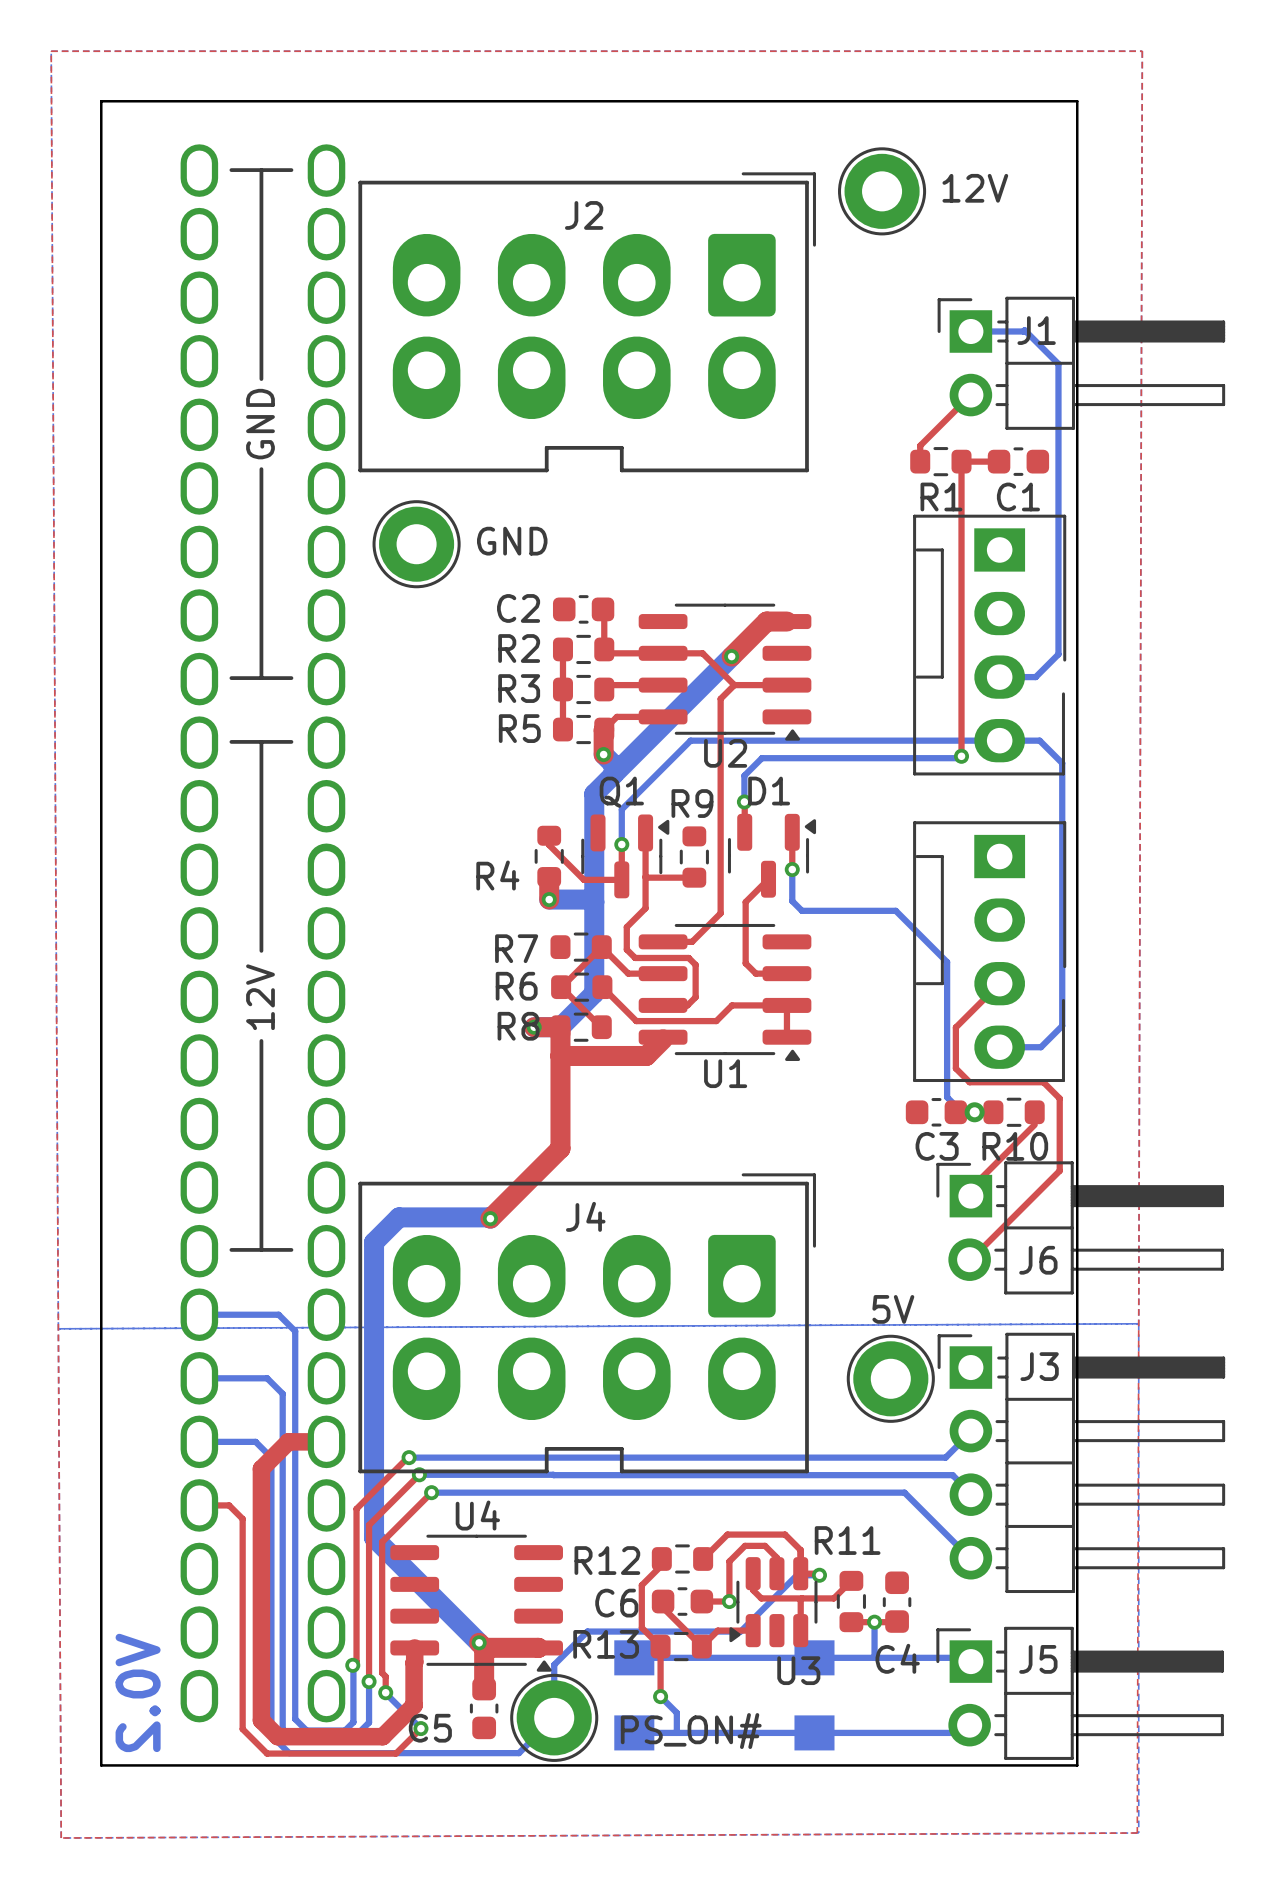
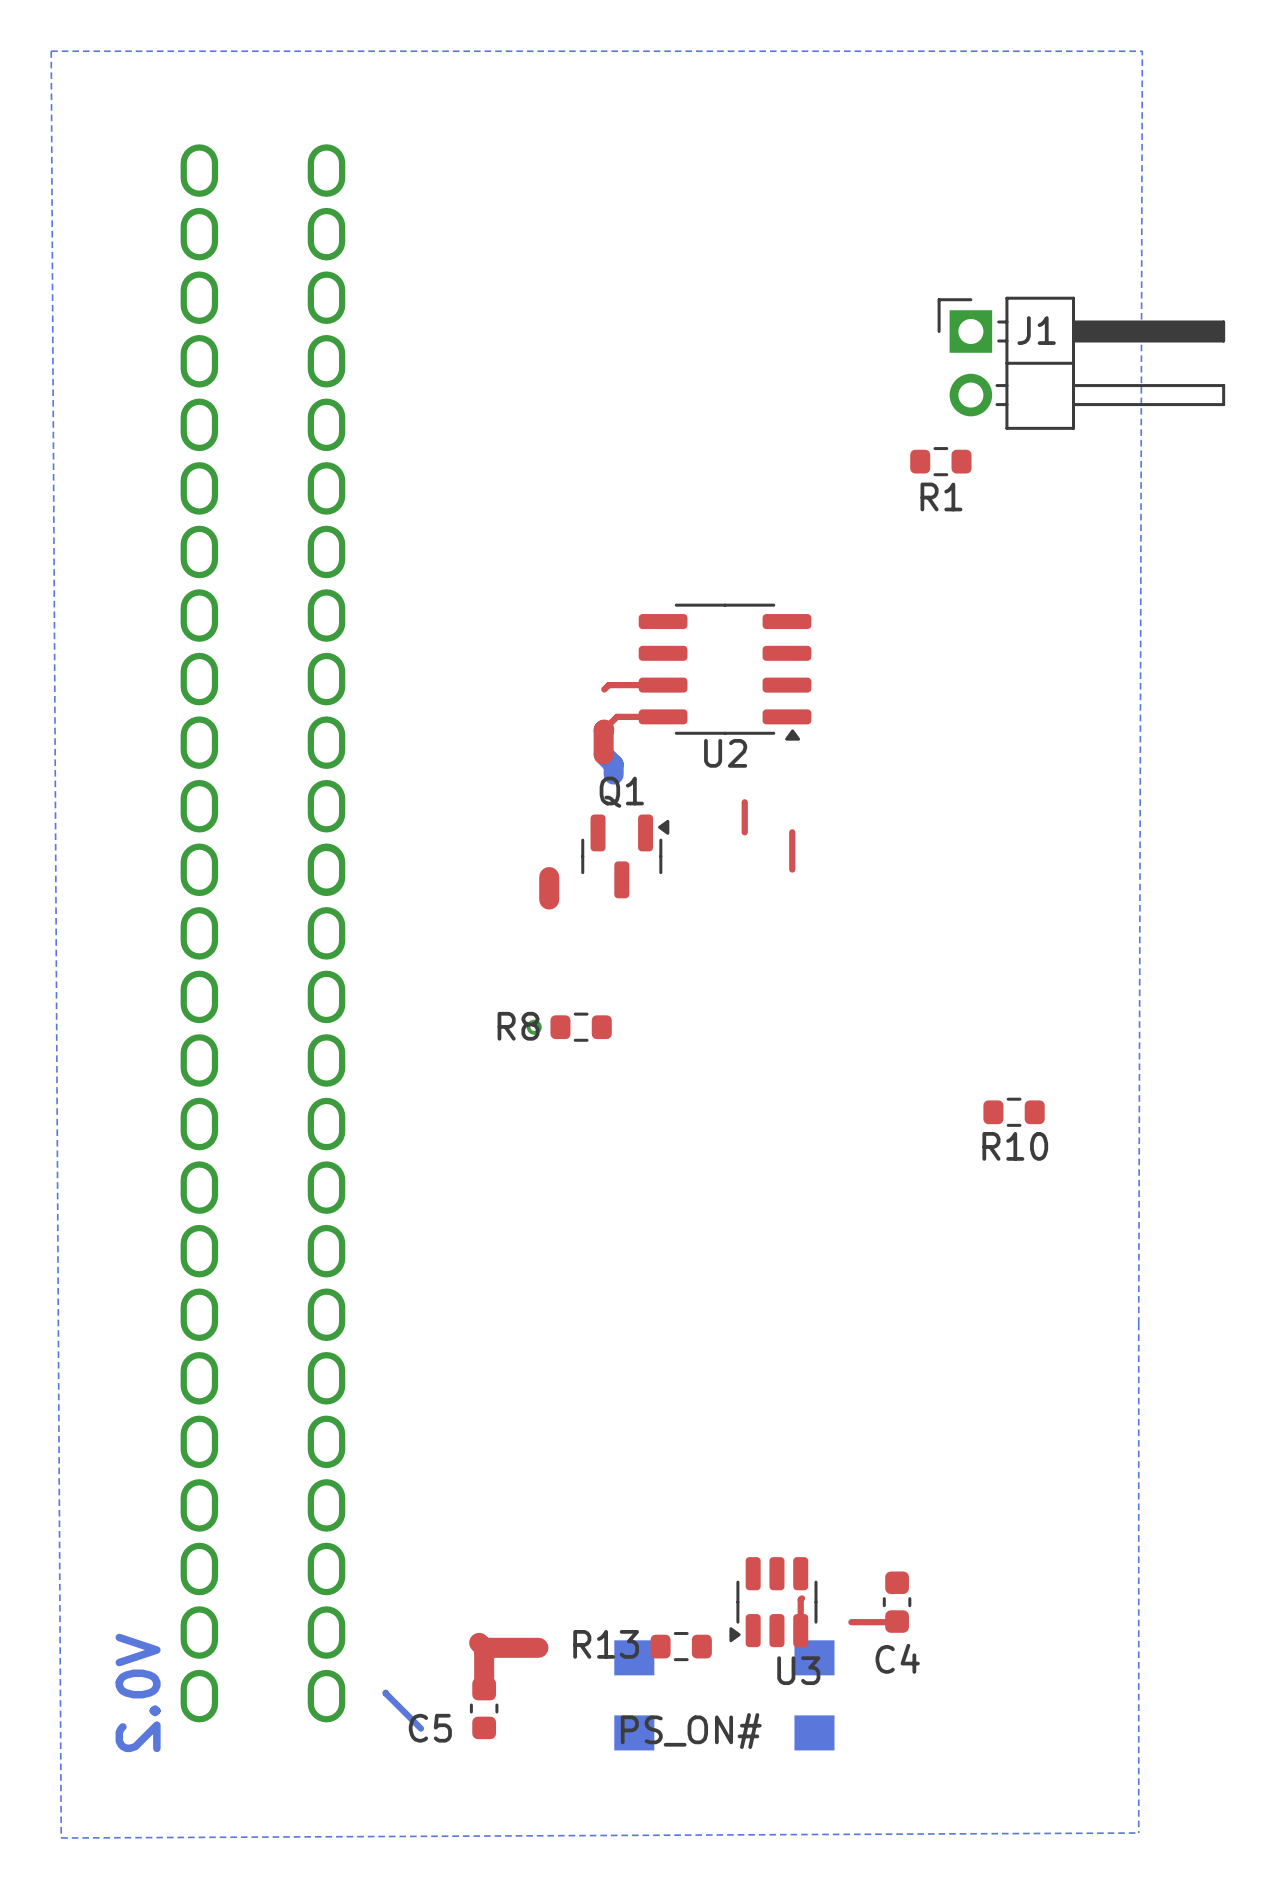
top zone outline: (51, 51) (1142, 51) (1137, 1833) (61, 1838) (51, 51) -> none
board edge: (101, 101) (101, 1765) (1077, 1765) (1077, 101) (101, 101) -> none
line: (231, 170) (291, 170) -> none
line: (261, 170) (261, 379) -> none
text: 12V (975, 188) -> none
part: (882, 191) -> none
J2: (587, 322) -> none
bottom track: (970, 331) (1024, 330) (1058, 364) (1058, 654) (1035, 677) (999, 677) -> none
top track: (970, 395) (920, 445) (920, 461) -> none
text: GND (260, 424) -> none
top track: (999, 461) (961, 461) (961, 756) -> none
C1: (1018, 461) -> none
line: (261, 469) (261, 678) -> none
text: GND (512, 541) -> none
part: (416, 544) -> none
C2: (583, 609) -> none
top track: (603, 609) (604, 649) (608, 653) (702, 653) (734, 685) -> none
top track: (786, 621) (766, 621) (731, 656) -> none
part: (989, 645) -> none
top track: (562, 649) (562, 729) -> none
R2: (583, 649) -> none
bottom track: (731, 656) (594, 793) (594, 993) (560, 1027) (534, 1027) -> none
via: (731, 656) -> none
line: (231, 678) (291, 678) -> none
top track: (734, 685) (720, 698) (720, 913) (692, 941) (663, 941) -> none
top track: (734, 685) (786, 685) -> none
R3: (583, 689) -> none
R5: (583, 729) -> none
line: (231, 741) (291, 741) -> none
line: (261, 741) (261, 950) -> none
via: (603, 754) -> none
bottom track: (961, 756) (959, 758) (761, 758) (744, 775) (744, 801) -> none
via: (961, 756) -> none
via: (744, 801) -> none
top track: (647, 830) (645, 832) (645, 908) (626, 927) (626, 949) (635, 957) (688, 957) (695, 964) (695, 997) (687, 1005) (663, 1005) -> none
top track: (549, 835) (549, 845) (583, 879) (621, 879) (621, 844) -> none
bottom track: (621, 844) (621, 809) (690, 740) (1039, 740) (1062, 763) (1062, 1025) (1040, 1047) (999, 1047) -> none
via: (621, 844) -> none
D1: (772, 855) -> none
R4: (549, 856) -> none
R9: (694, 857) -> none
bottom track: (792, 869) (792, 901) (801, 910) (895, 910) (947, 962) (947, 1097) (962, 1112) (974, 1112) -> none
via: (792, 869) -> none
top track: (645, 877) (694, 877) -> none
top track: (768, 879) (745, 902) (745, 963) (755, 973) (786, 973) -> none
bottom track: (549, 899) (591, 899) (594, 902) -> none
via: (549, 899) -> none
R7: (581, 947) -> none
part: (989, 951) -> none
top track: (663, 973) (628, 973) (601, 947) (561, 987) (601, 1027) -> none
top track: (1011, 983) (999, 983) (955, 1027) (955, 1068) (969, 1082) (1043, 1082) (1059, 1098) (1059, 1170) (970, 1259) -> none
R6: (581, 987) -> none
top track: (602, 987) (636, 1021) (716, 1021) (732, 1005) (786, 1005) (786, 1037) -> none
U1: (725, 992) -> none
text: 12V (260, 997) -> none
top track: (534, 1027) (560, 1027) (560, 1148) (490, 1218) -> none
top track: (663, 1039) (646, 1055) (560, 1055) -> none
line: (261, 1040) (261, 1249) -> none
C3: (936, 1112) -> none
via: (974, 1112) -> none
top track: (1034, 1124) (970, 1188) (970, 1196) -> none
bottom track: (490, 1218) (399, 1217) (374, 1242) (374, 1537) (479, 1642) -> none
via: (490, 1218) -> none
J6: (1080, 1227) -> none
line: (231, 1249) (291, 1249) -> none
text: 5V (893, 1309) -> none
bottom track: (199, 1314) (278, 1314) (295, 1331) (295, 1719) (306, 1730) (345, 1730) (353, 1722) (352, 1665) -> none
J4: (587, 1323) -> none
bottom zone outline: (1138, 1323) (58, 1328) -> none
bottom track: (199, 1378) (267, 1378) (282, 1393) (282, 1729) (295, 1741) (349, 1741) (369, 1722) (369, 1681) -> none
part: (890, 1378) -> none
bottom track: (972, 1431) (945, 1457) (409, 1457) -> none
bottom track: (199, 1441) (255, 1441) (271, 1457) (271, 1735) (289, 1753) (518, 1753) (554, 1717) -> none
top track: (326, 1441) (288, 1441) (261, 1468) (261, 1720) (277, 1736) (382, 1736) (414, 1705) (414, 1647) -> none
top track: (409, 1457) (356, 1508) (356, 1661) (352, 1665) -> none
via: (409, 1457) -> none
J3: (1081, 1462) -> none
top track: (419, 1474) (369, 1525) (369, 1681) -> none
bottom track: (419, 1474) (952, 1475) (972, 1494) -> none
via: (419, 1474) -> none
top track: (431, 1492) (382, 1542) (382, 1673) (385, 1676) (385, 1692) -> none
bottom track: (431, 1492) (904, 1492) (970, 1558) -> none
via: (431, 1492) -> none
top track: (199, 1505) (229, 1505) (242, 1518) (242, 1729) (267, 1753) (395, 1753) (420, 1728) -> none
top track: (661, 1558) (661, 1565) (641, 1585) (641, 1627) (660, 1646) (660, 1696) -> none
R12: (682, 1558) -> none
top track: (703, 1558) (727, 1534) (785, 1534) (800, 1550) (800, 1573) (819, 1575) -> none
top track: (753, 1573) (753, 1590) (761, 1598) (833, 1598) (851, 1580) -> none
top track: (776, 1573) (776, 1557) (765, 1545) (745, 1545) (729, 1561) (729, 1601) (701, 1601) -> none
bottom track: (819, 1575) (796, 1575) (740, 1631) (587, 1631) (554, 1664) (554, 1717) -> none
via: (819, 1575) -> none
top track: (663, 1601) (663, 1607) (701, 1646) (717, 1630) (753, 1630) -> none
C6: (682, 1601) -> none
via: (729, 1601) -> none
R11: (851, 1601) -> none
U4: (476, 1603) -> none
bottom track: (874, 1622) (874, 1657) -> none
via: (874, 1622) -> none
via: (479, 1642) -> none
bottom track: (634, 1657) (965, 1657) (969, 1661) -> none
via: (352, 1665) -> none
via: (369, 1681) -> none
via: (385, 1692) -> none
J5: (1080, 1693) -> none
bottom track: (660, 1696) (676, 1712) (676, 1732) -> none
via: (660, 1696) -> none
part: (554, 1717) -> none
bottom track: (969, 1725) (961, 1732) (634, 1732) -> none
via: (420, 1728) -> none

